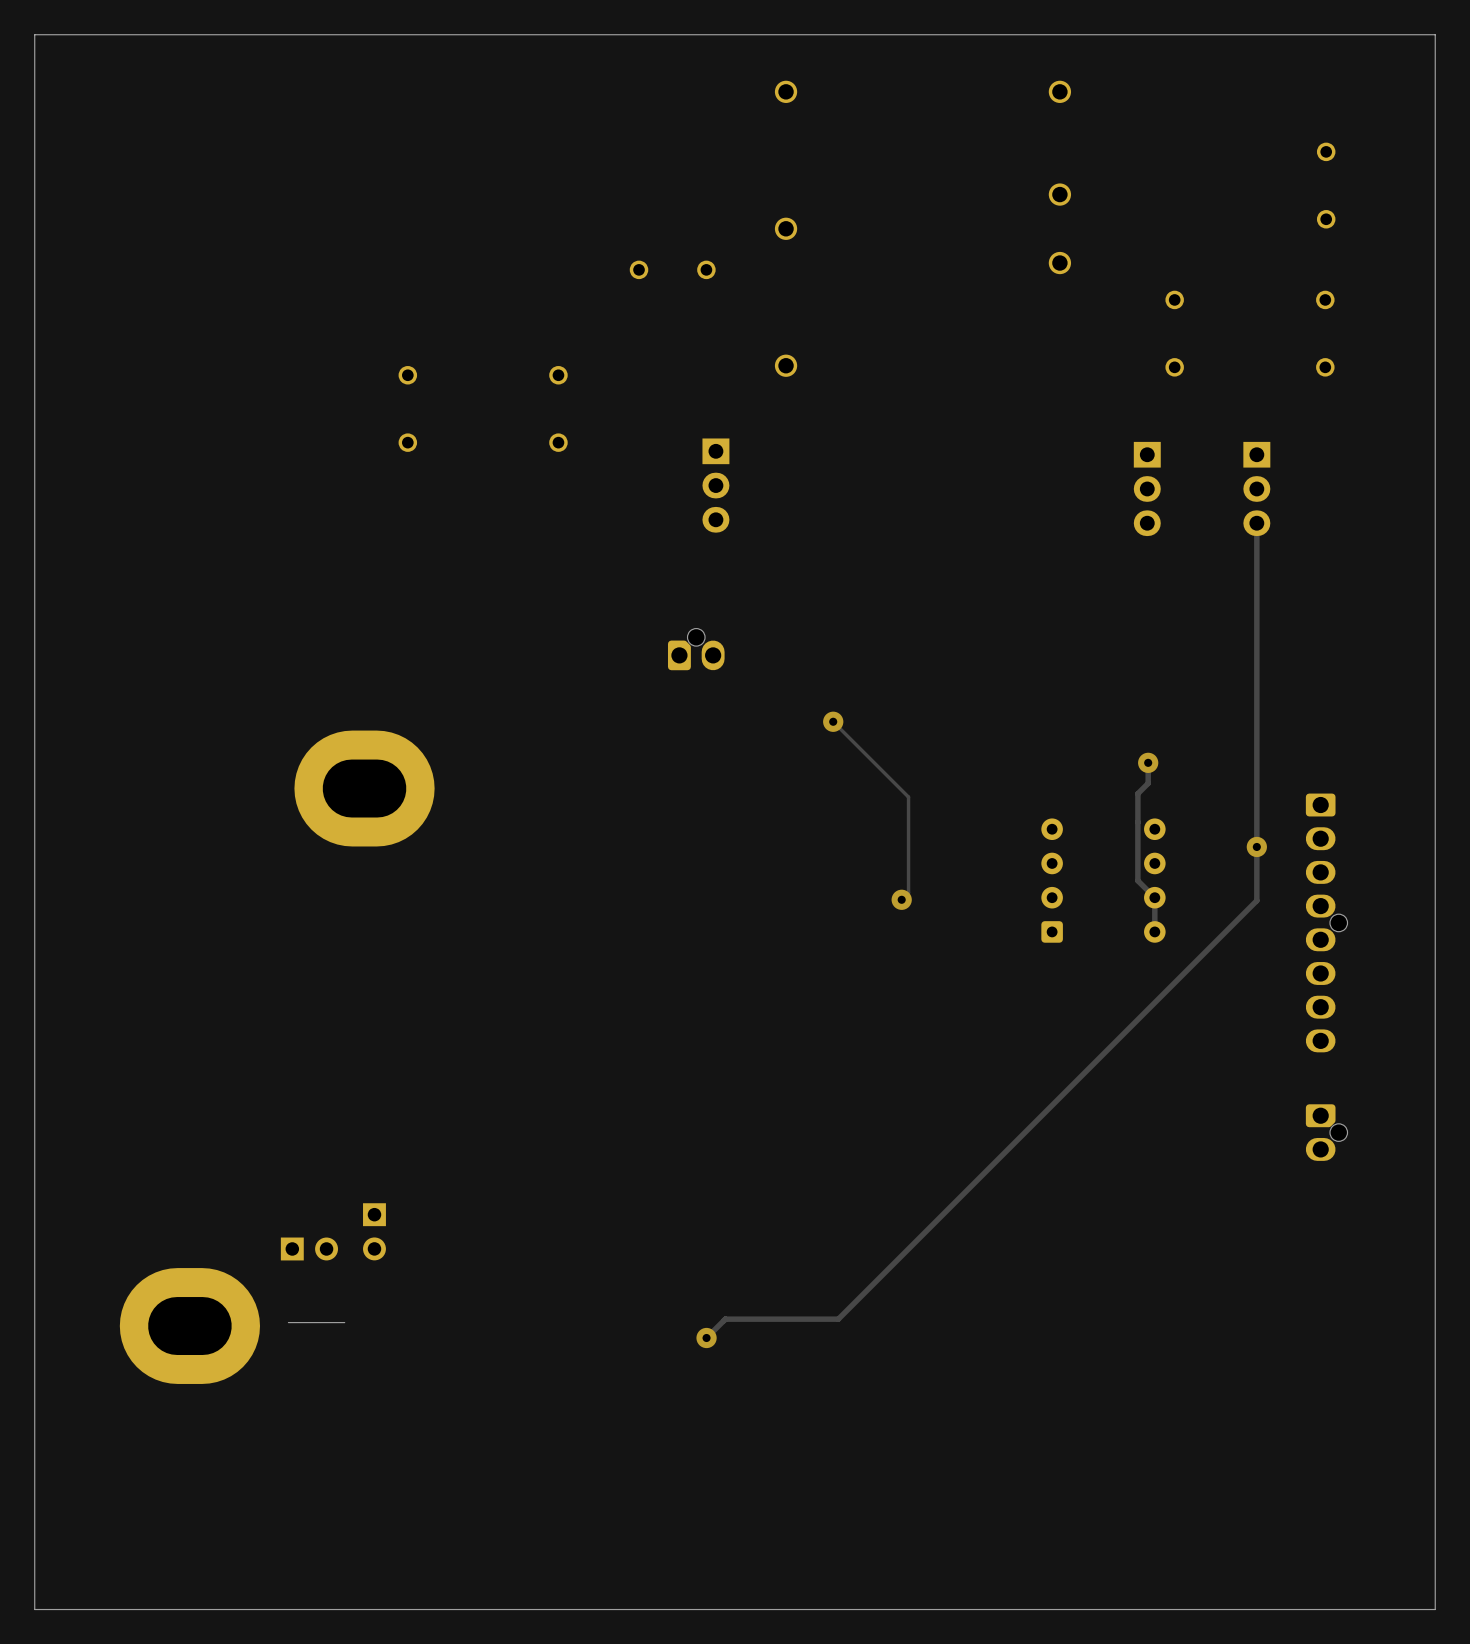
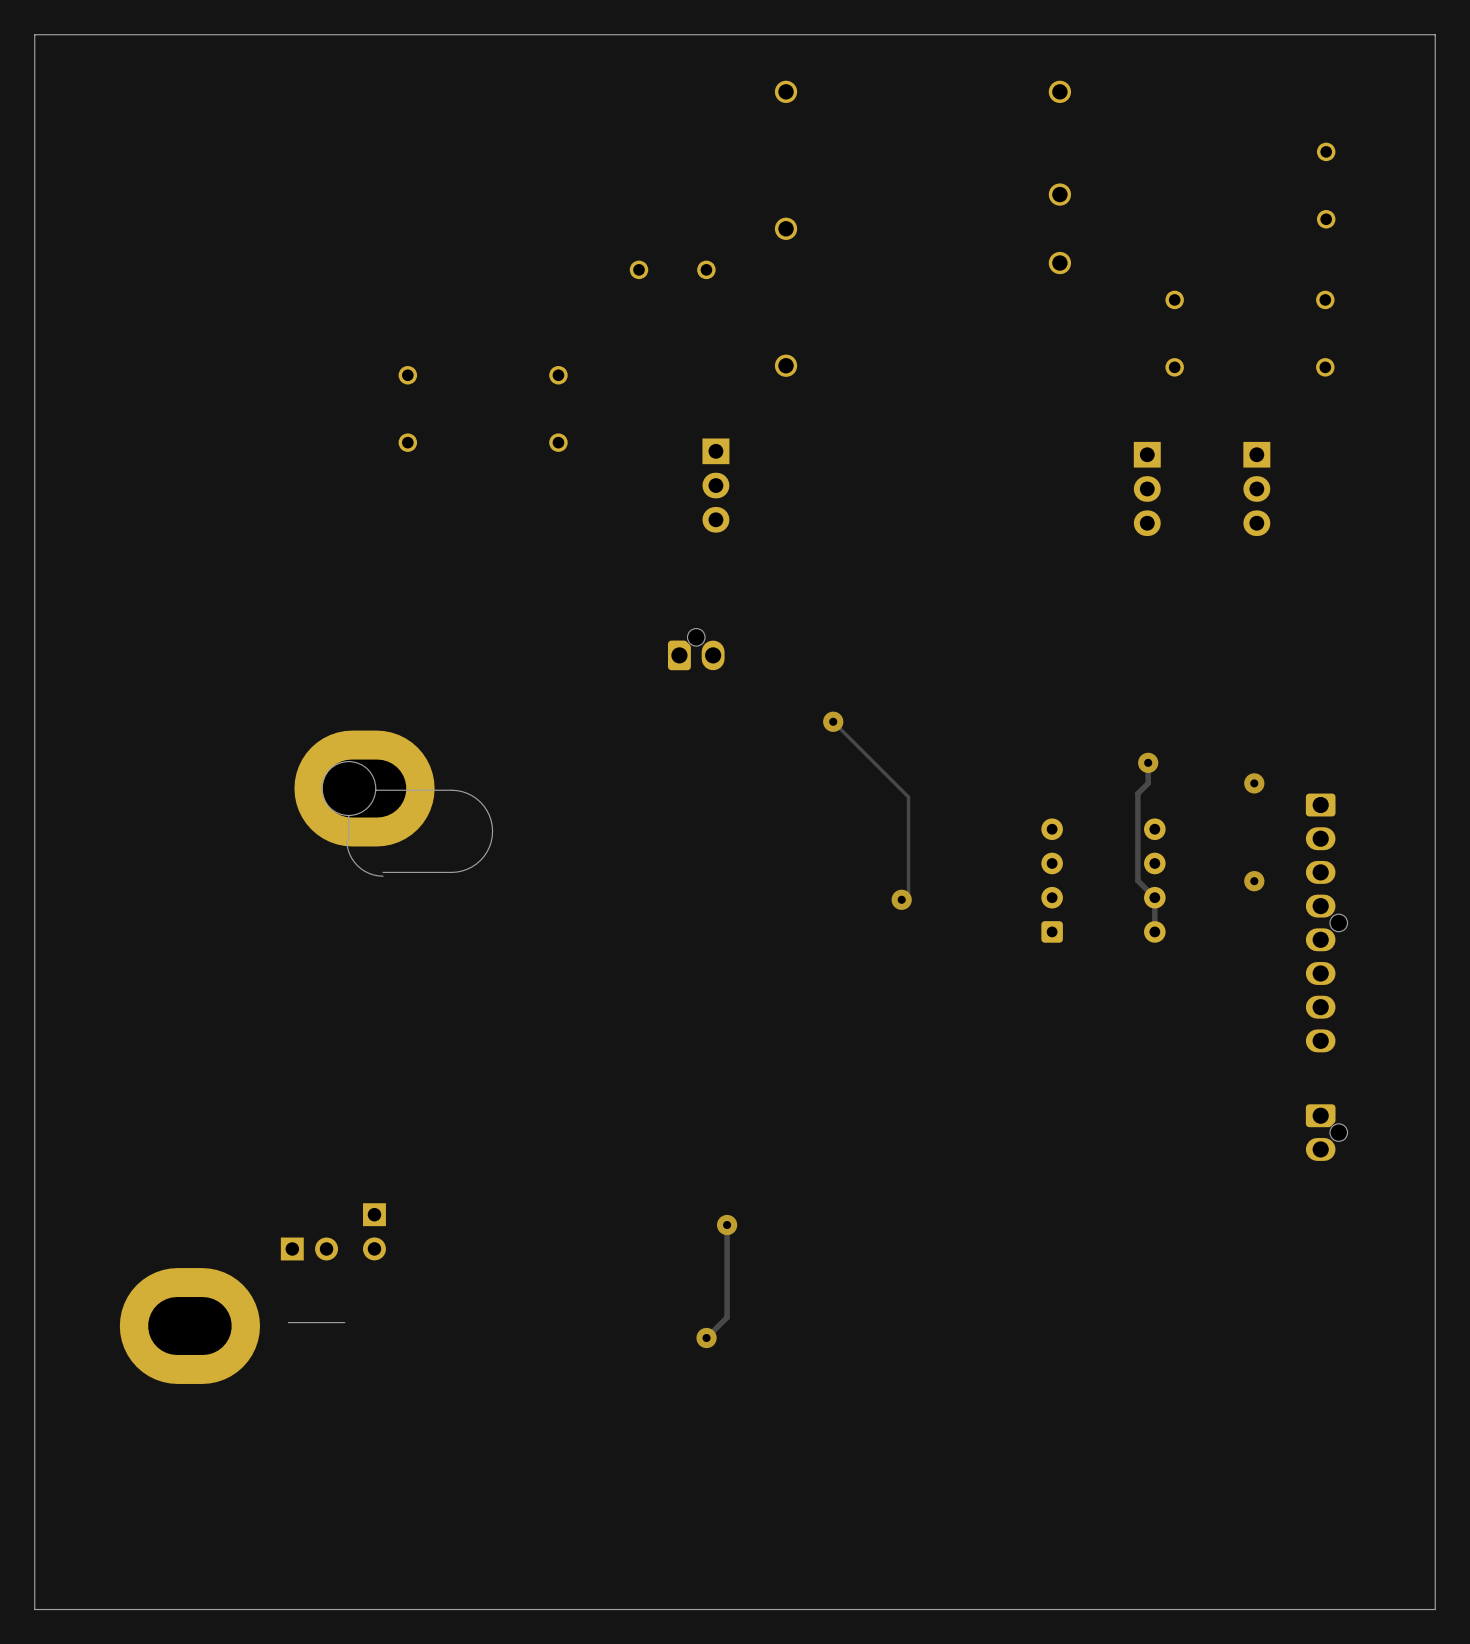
track: (1256, 523) (1256, 900) (838, 1319) (725, 1319) -> (727, 1225) (727, 1317) (725, 1319)
round board edge: none -> [321, 761, 377, 816]
via: none -> (1254, 783)
board edge: none -> (375, 790) (462, 791) (472, 795) (484, 806) (492, 825) (492, 836) (487, 851) (476, 863) (467, 869) (451, 872) (383, 872)
board edge: none -> (348, 815) (348, 839)
board edge: none -> (346, 839) (349, 853) (357, 865) (369, 873) (383, 876)
via: (1256, 846) -> none
via: none -> (1254, 881)
via: none -> (727, 1225)

